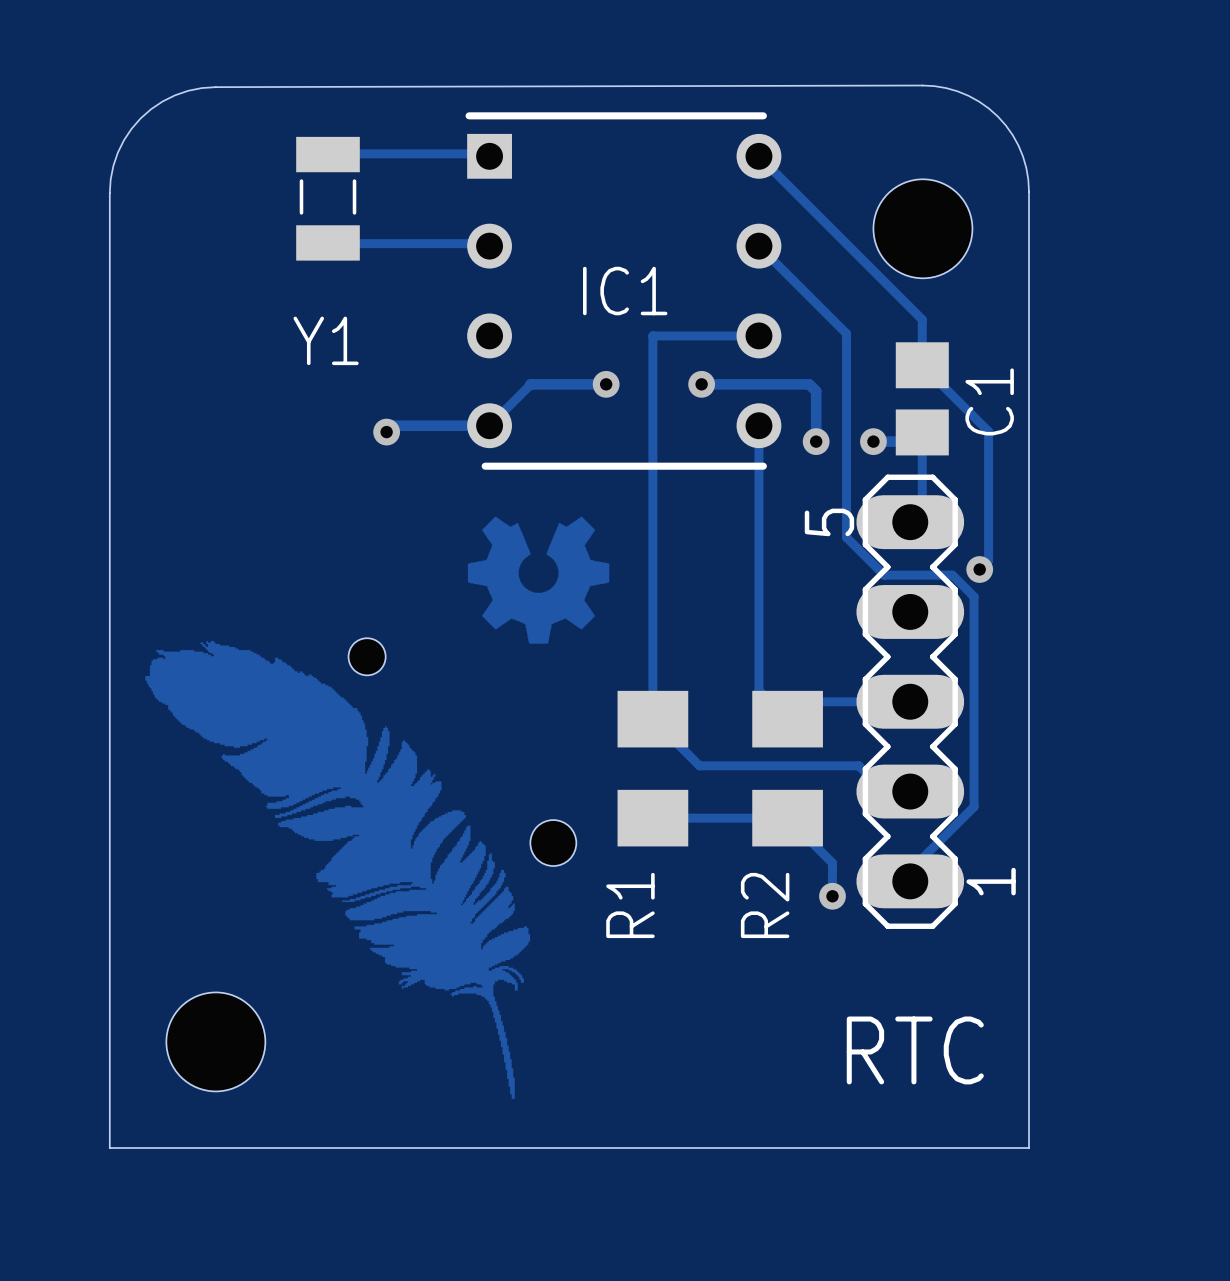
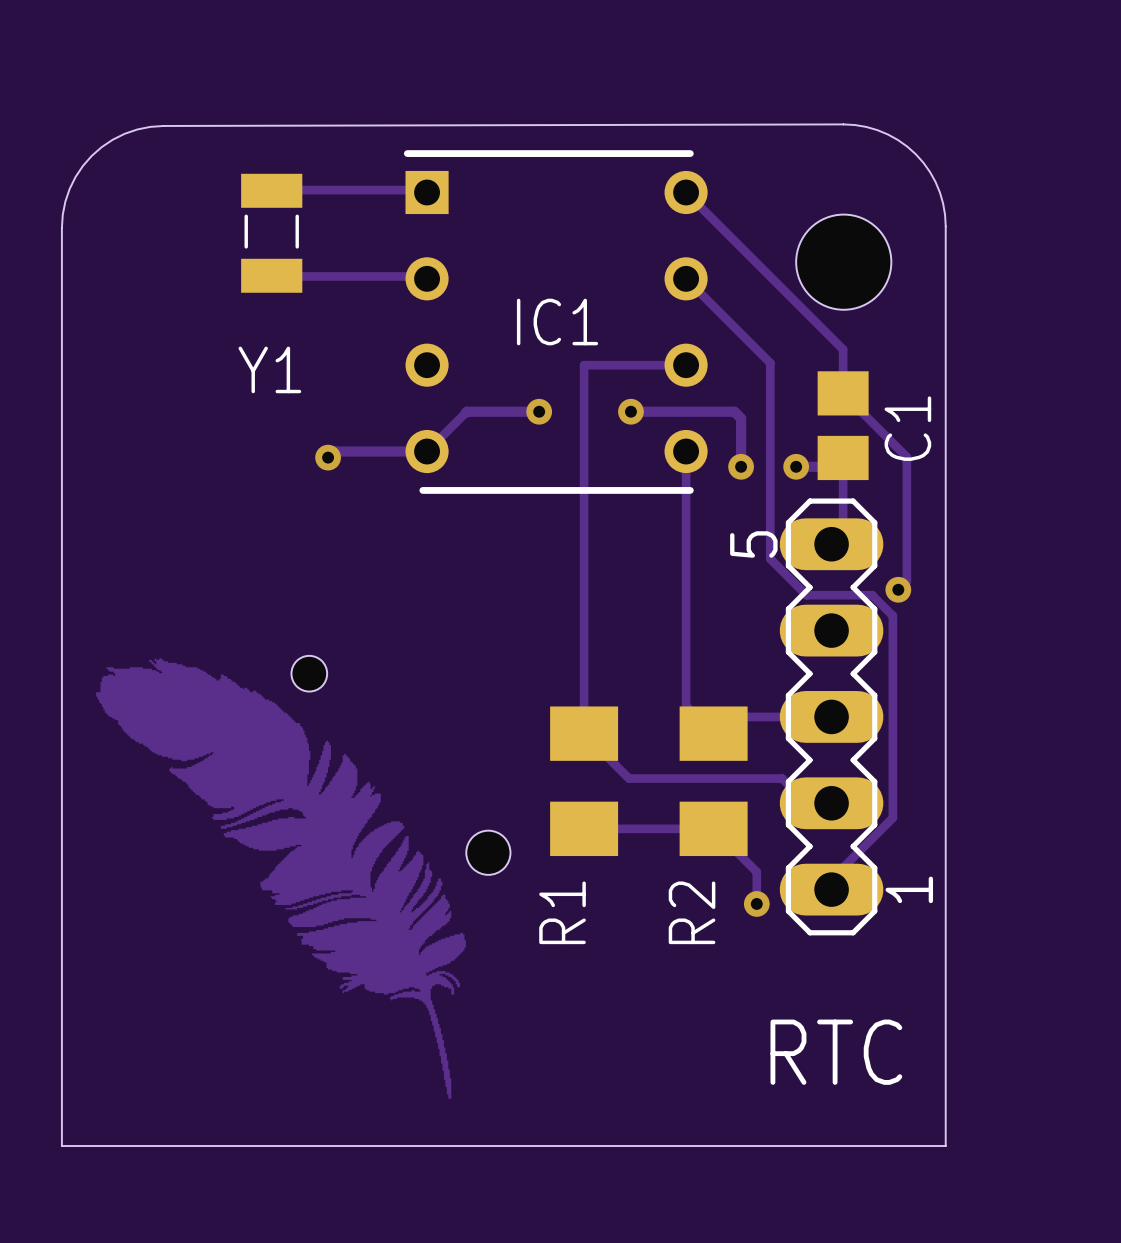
drawing: [467, 516, 610, 644] -> none
hole: (215, 1041) -> none

